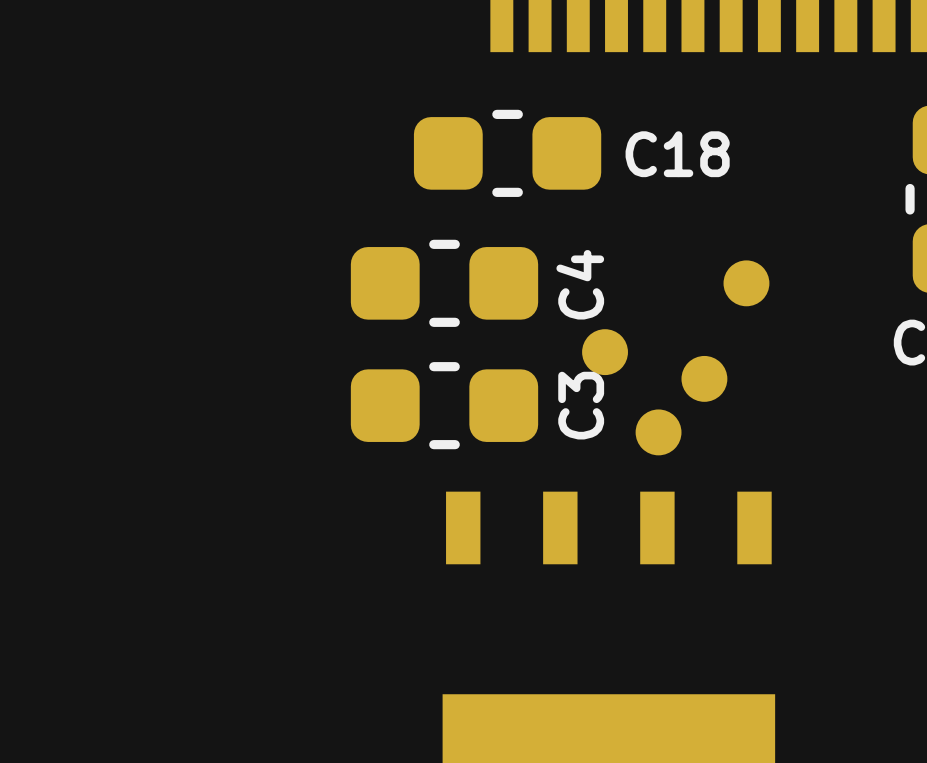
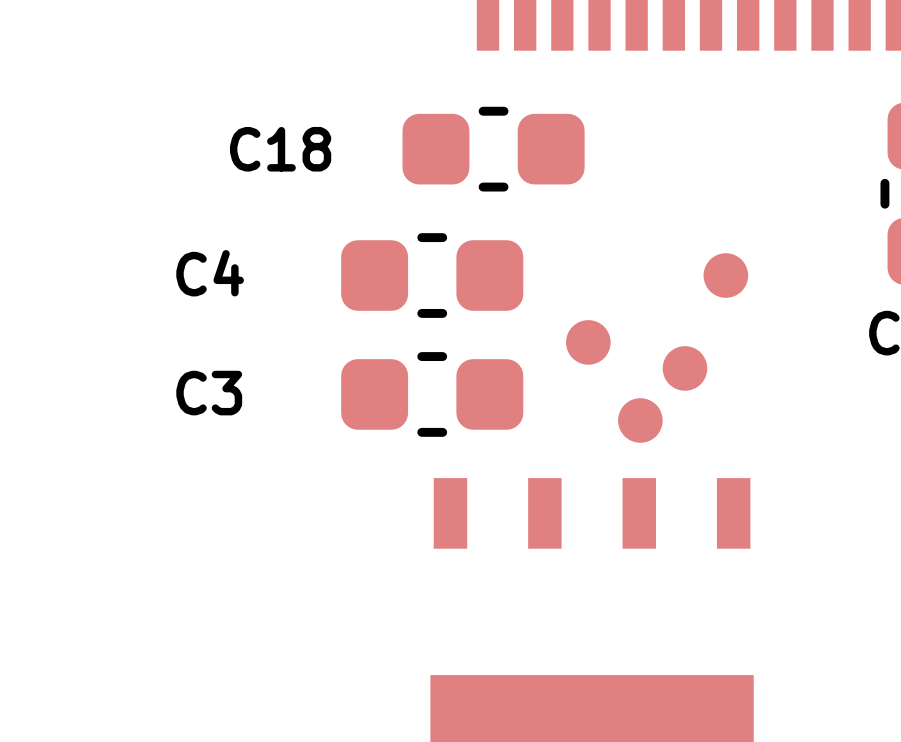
C18 name position: C18 (677, 154) -> C18 (280, 149)
C4 name rotation: 0° (580, 284) -> 90° clockwise (210, 273)
C4 name position: C4 (580, 284) -> C4 (210, 273)
C3 name rotation: 0° (581, 405) -> 90° clockwise (209, 393)
C3 name position: C3 (581, 405) -> C3 (209, 393)

